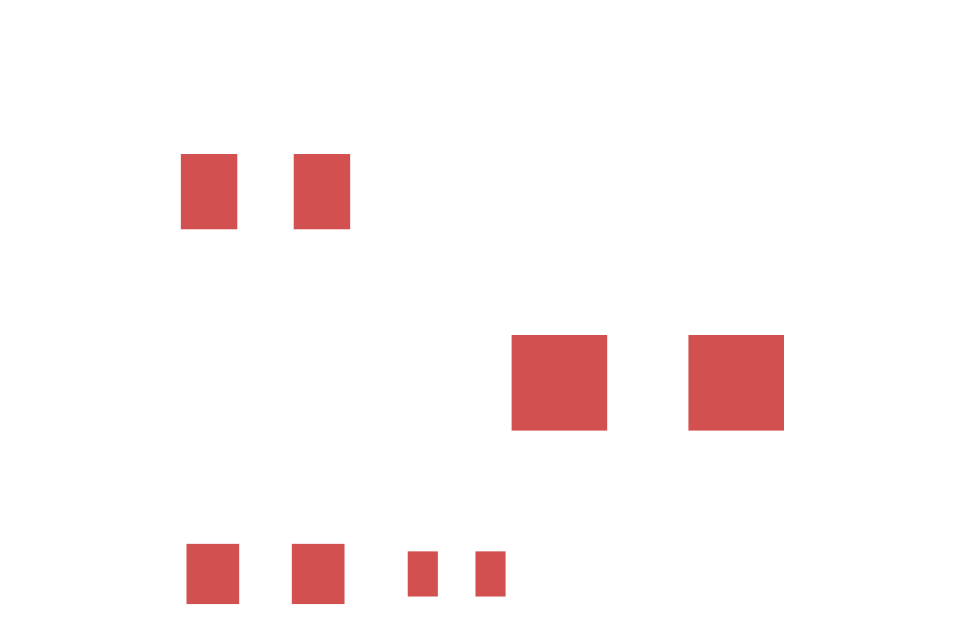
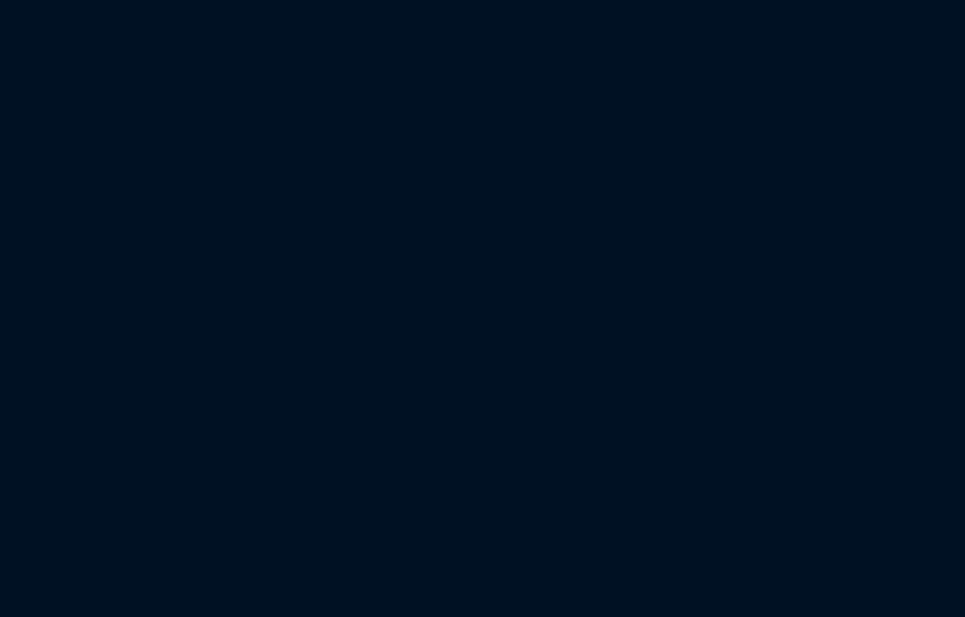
part: (265, 191) -> none
part: (647, 382) -> none
part: (265, 573) -> none
part: (456, 573) -> none

